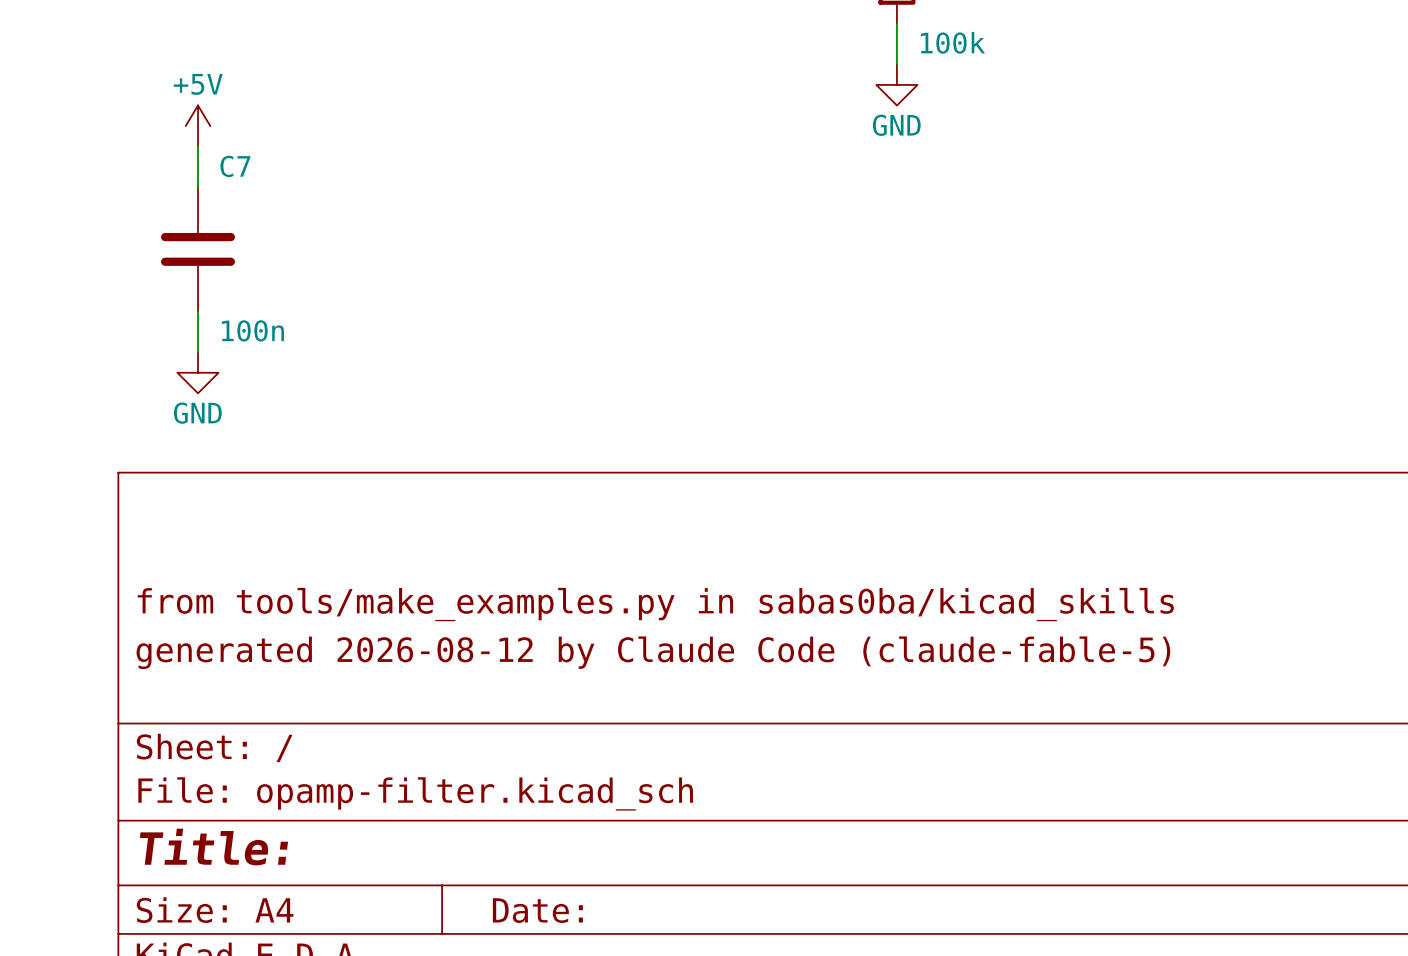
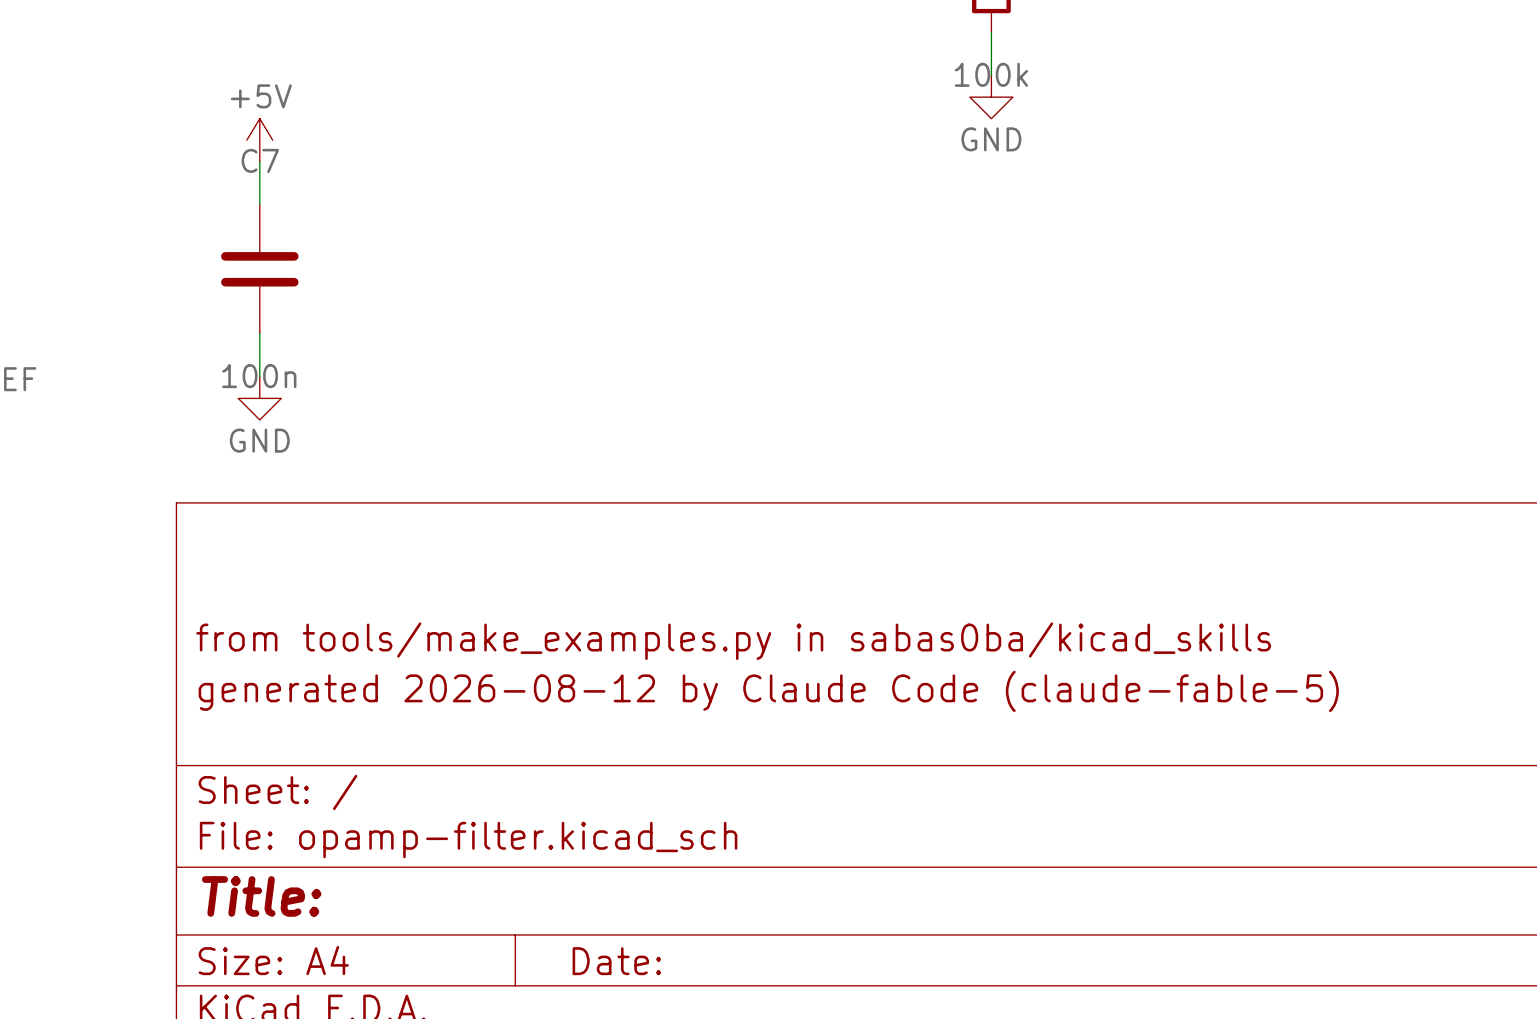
part value position: 100k (952, 42) -> 100k (991, 74)
C7 name position: C7 (235, 166) -> C7 (260, 160)
C7 value position: 100n (252, 330) -> 100n (259, 376)

